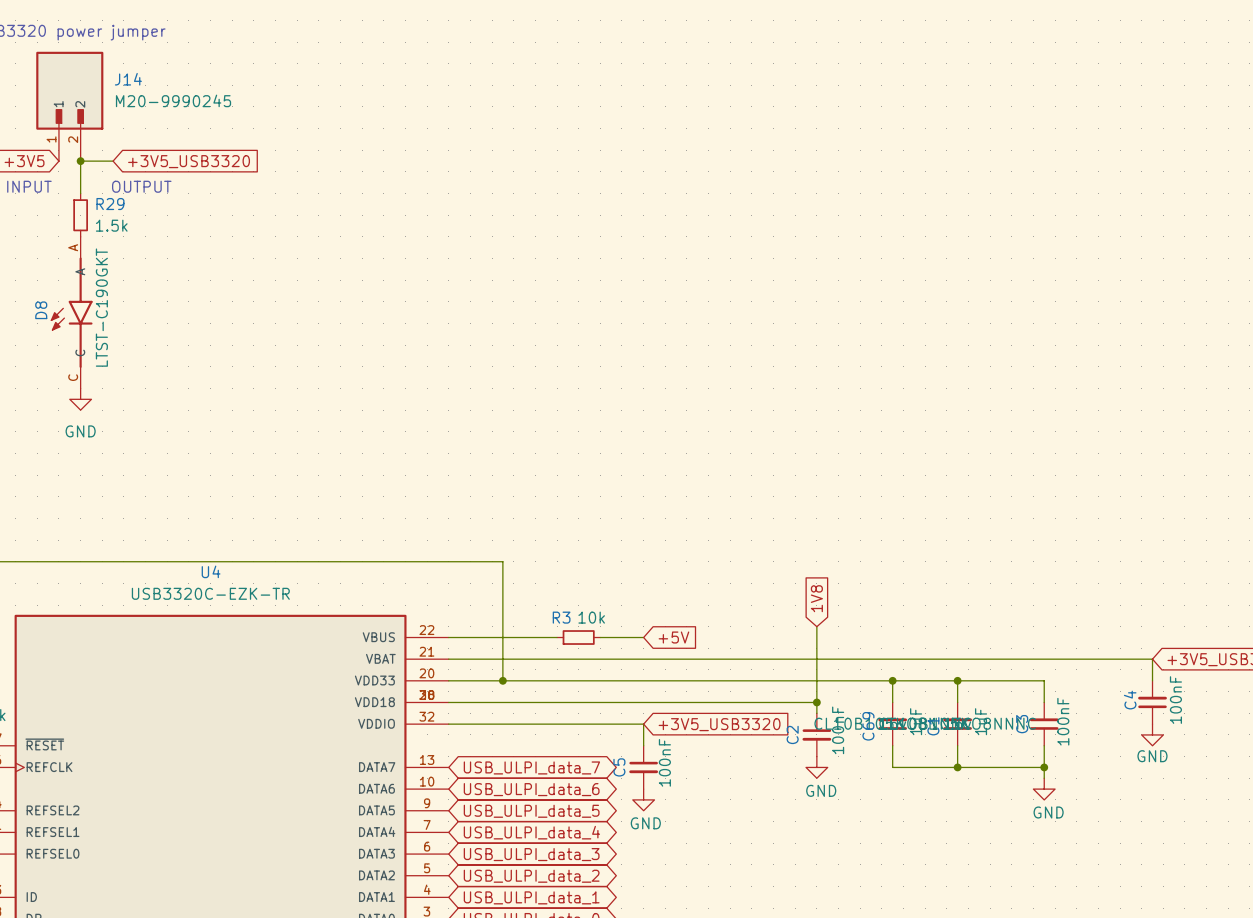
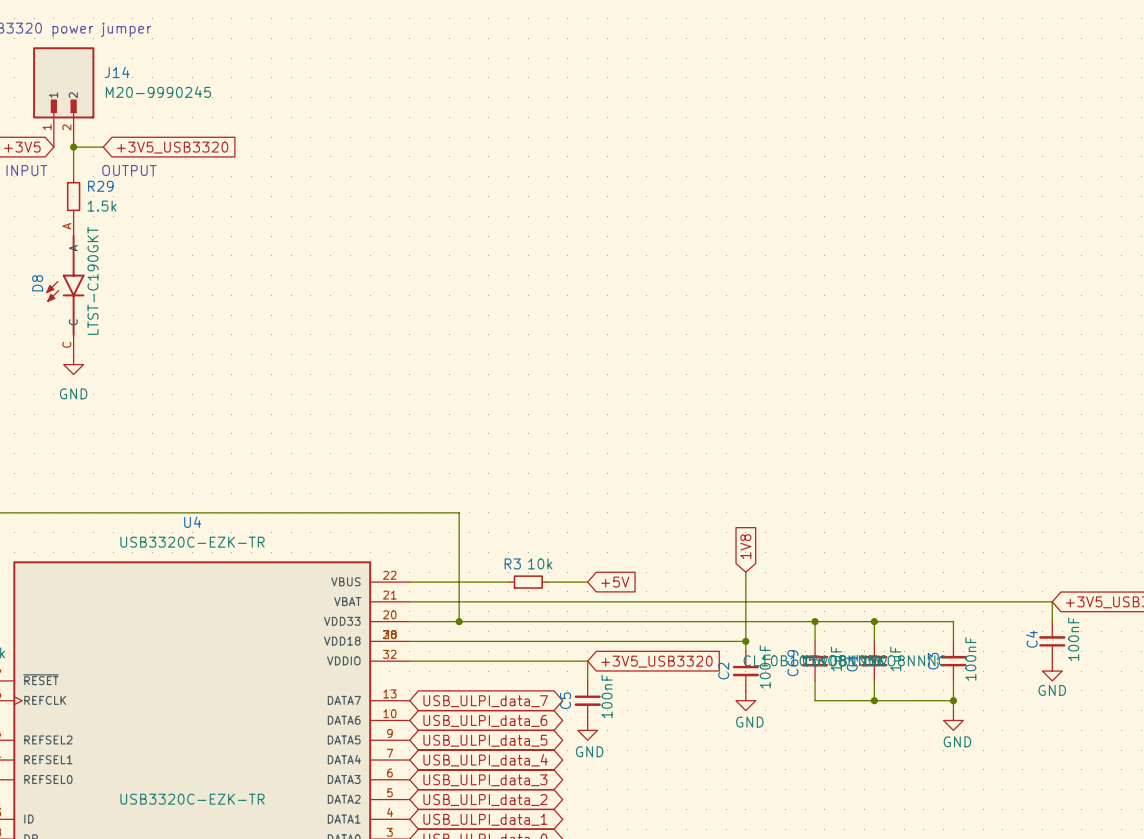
U4 text: none -> USB3320C-EZK-TR (192, 799)

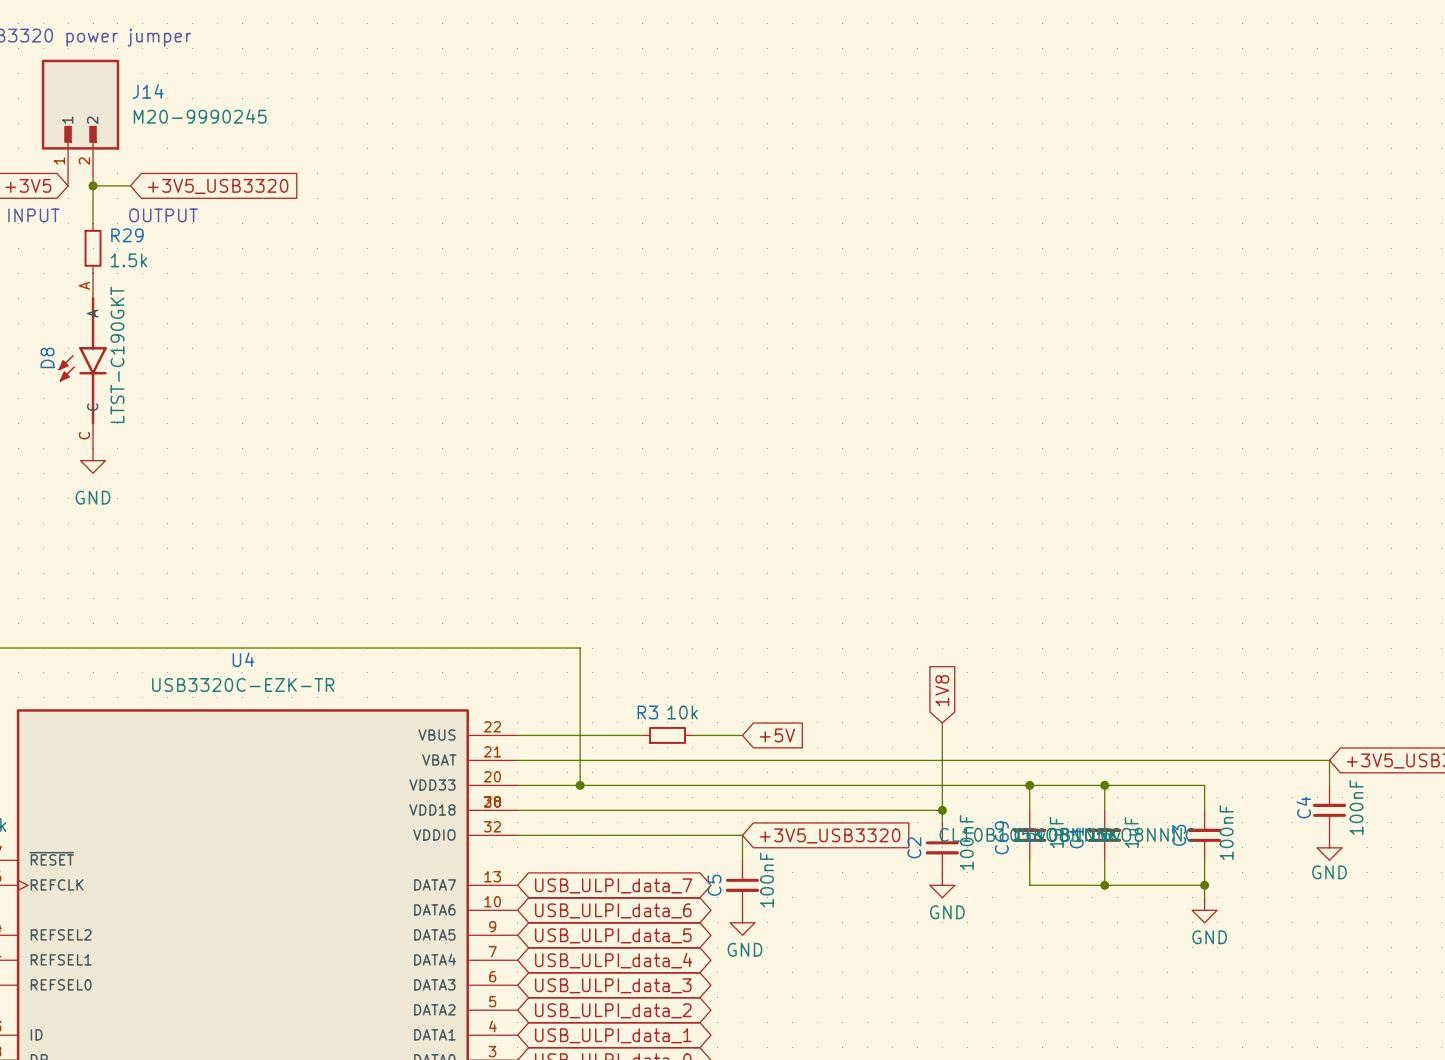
U4 text: USB3320C-EZK-TR (192, 799) -> none

